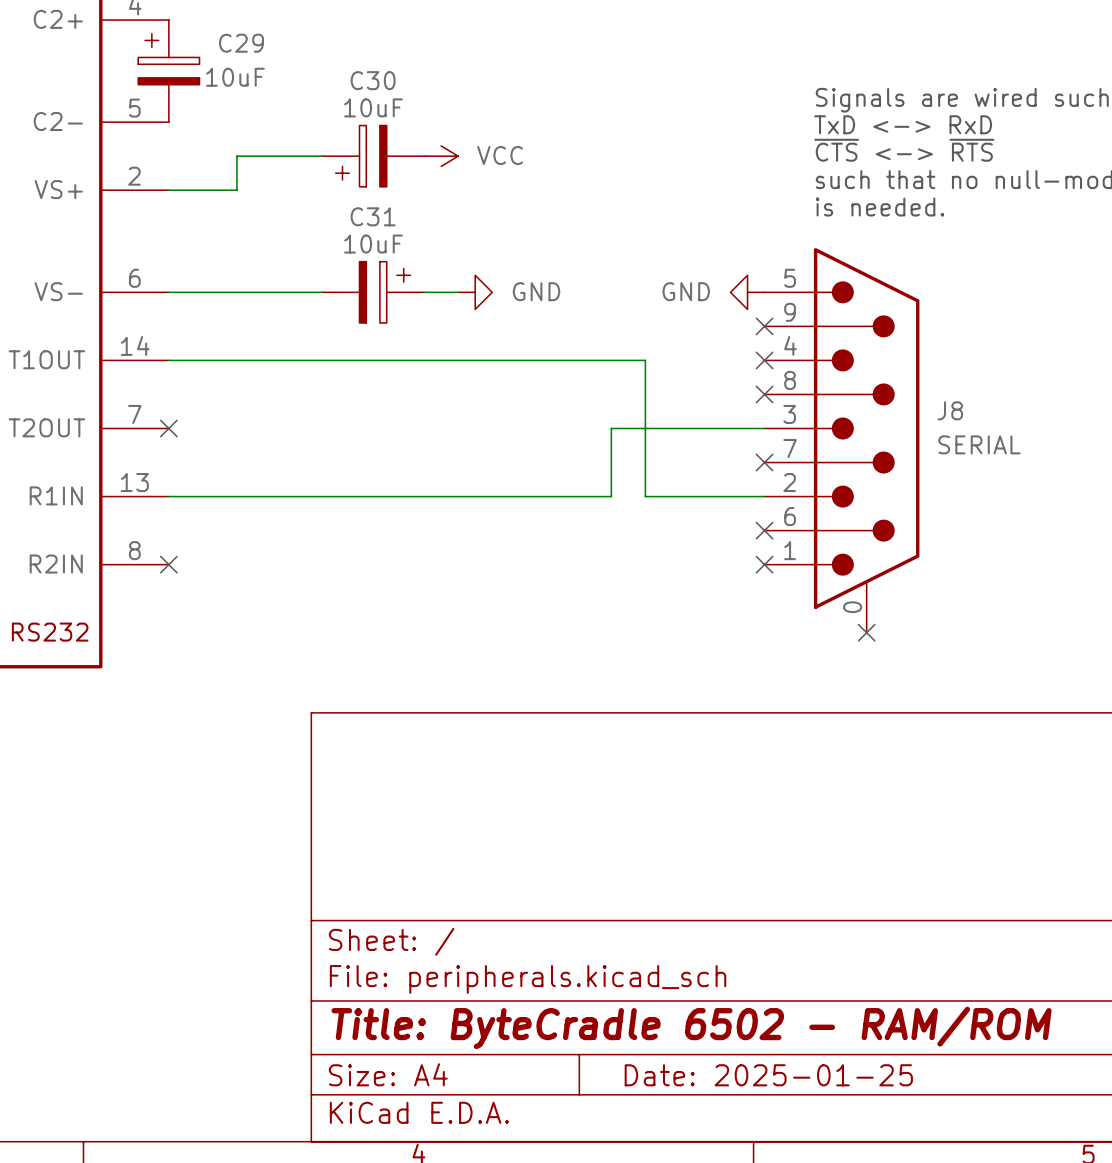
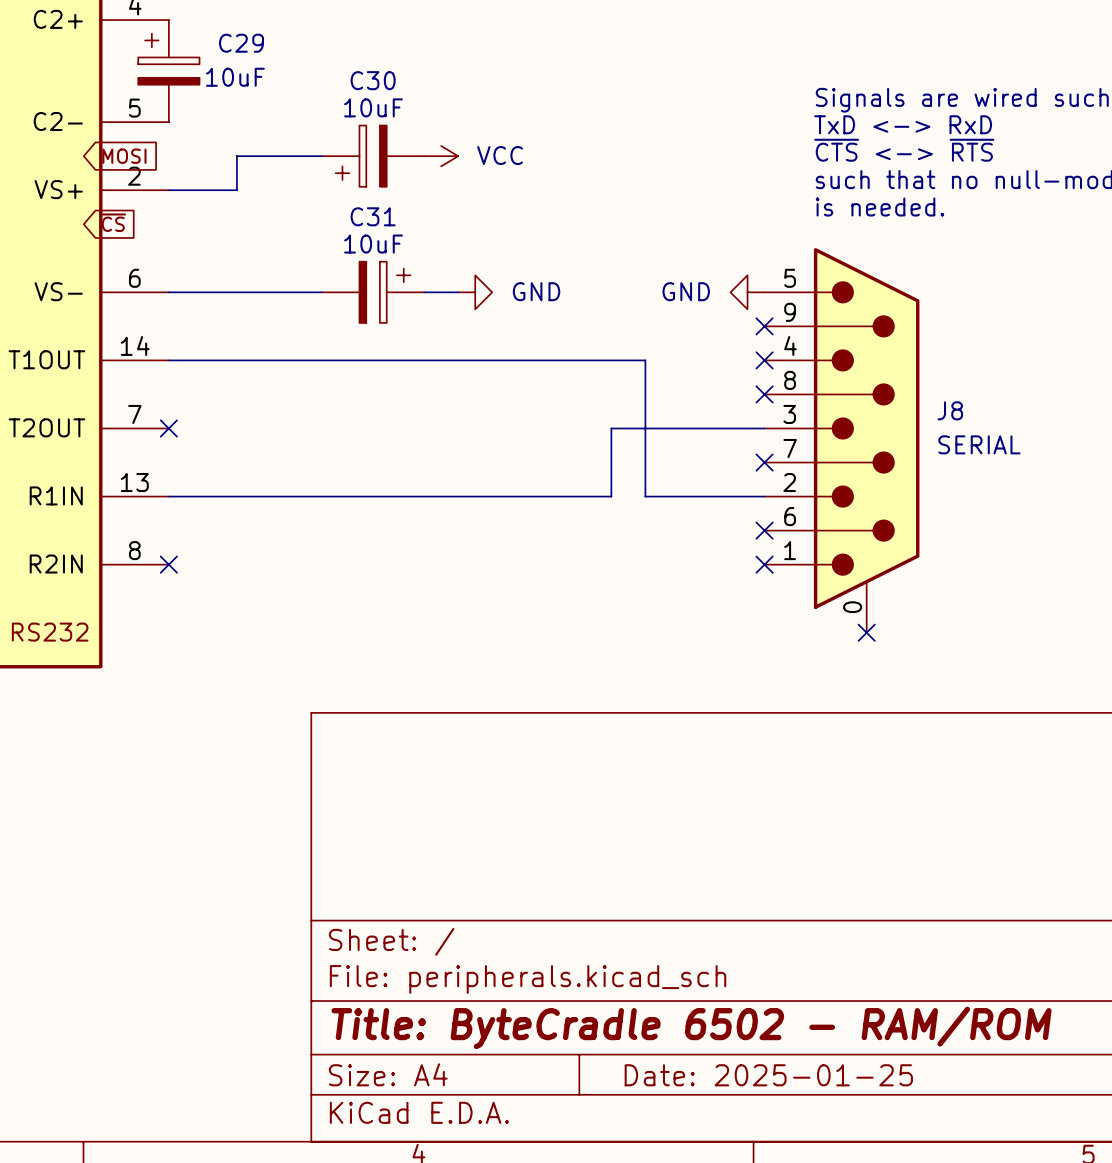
global label: none -> MOSI (124, 156)
global label: none -> ~{CS} (113, 222)

